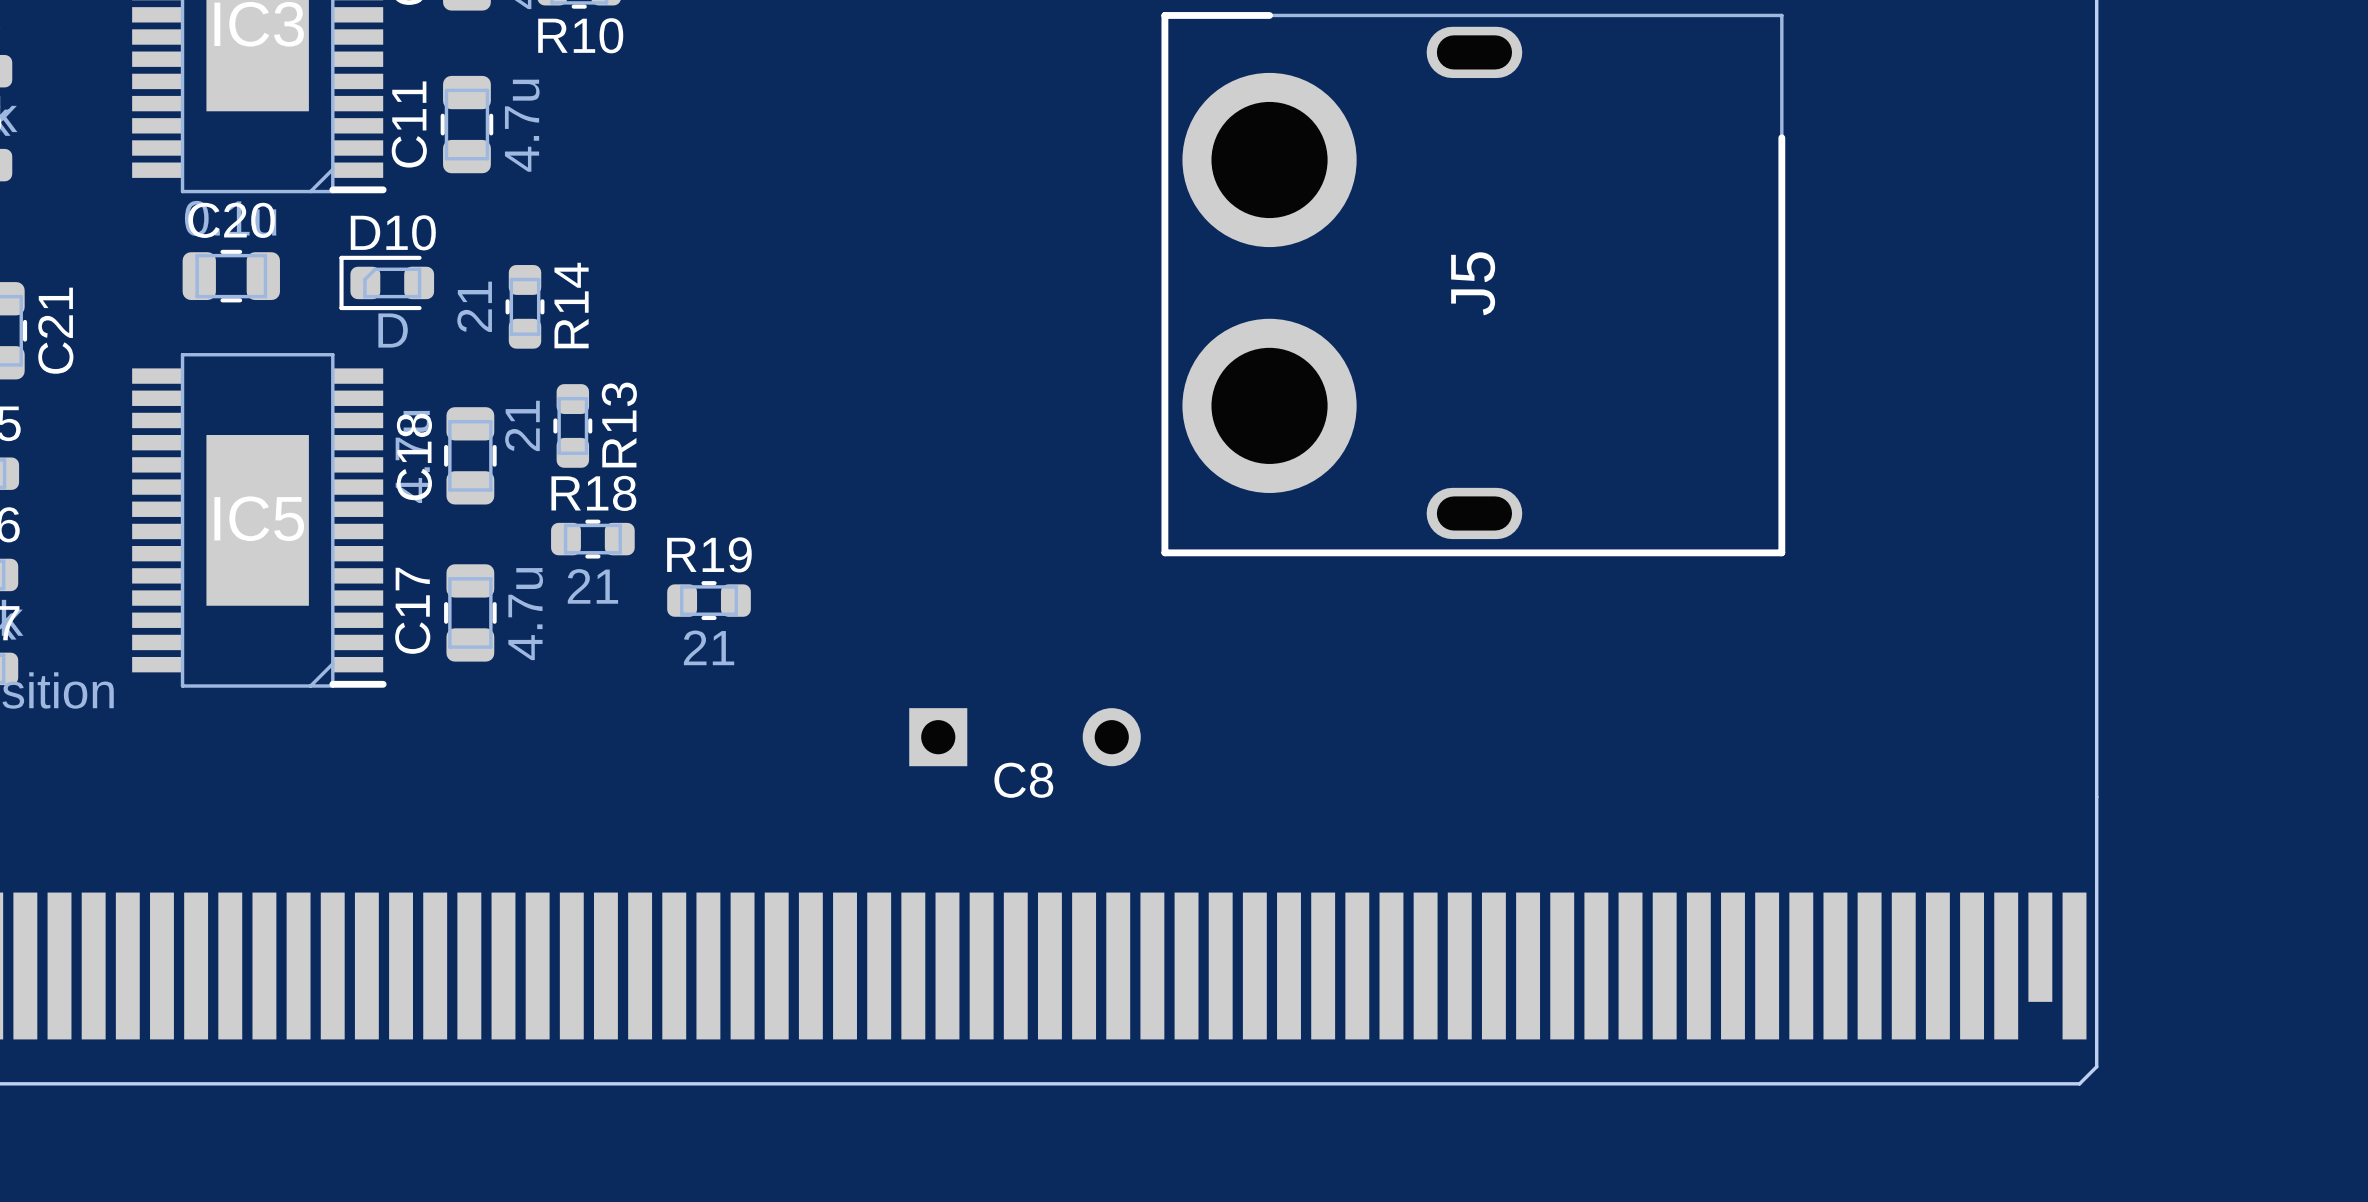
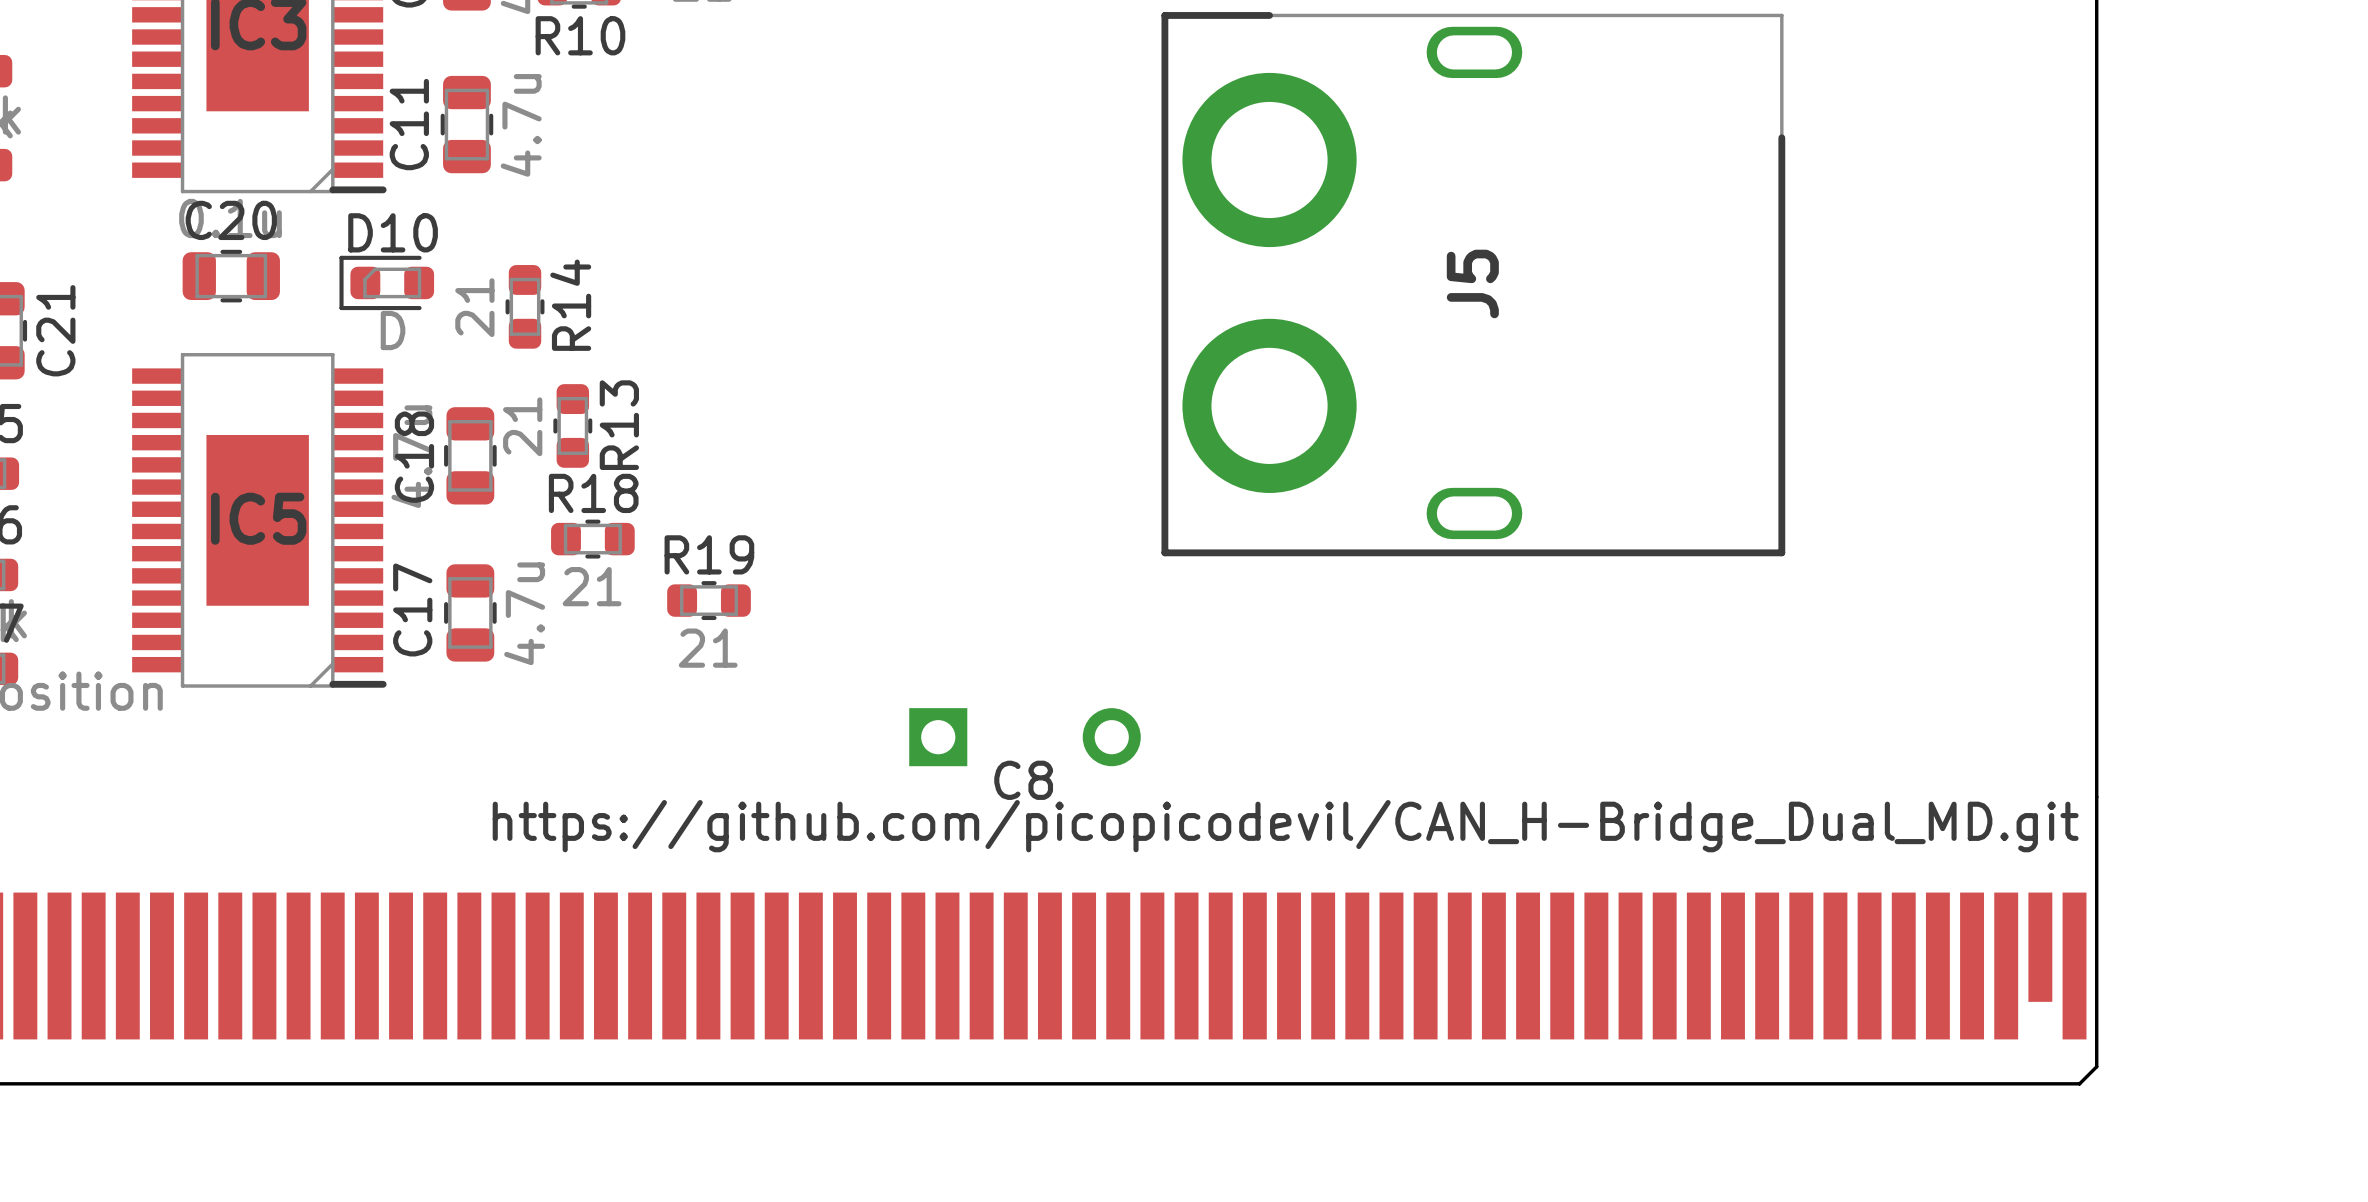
text: none -> https://github.com/picopicodevil/CAN_H-Bridge_Dual_MD.git (1285, 826)

